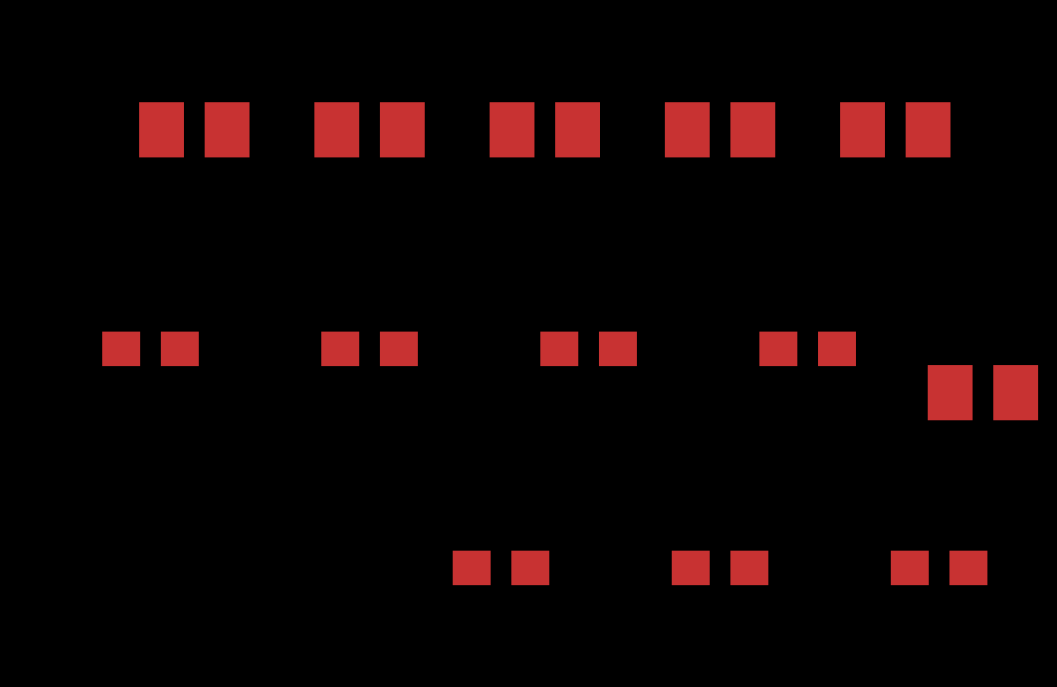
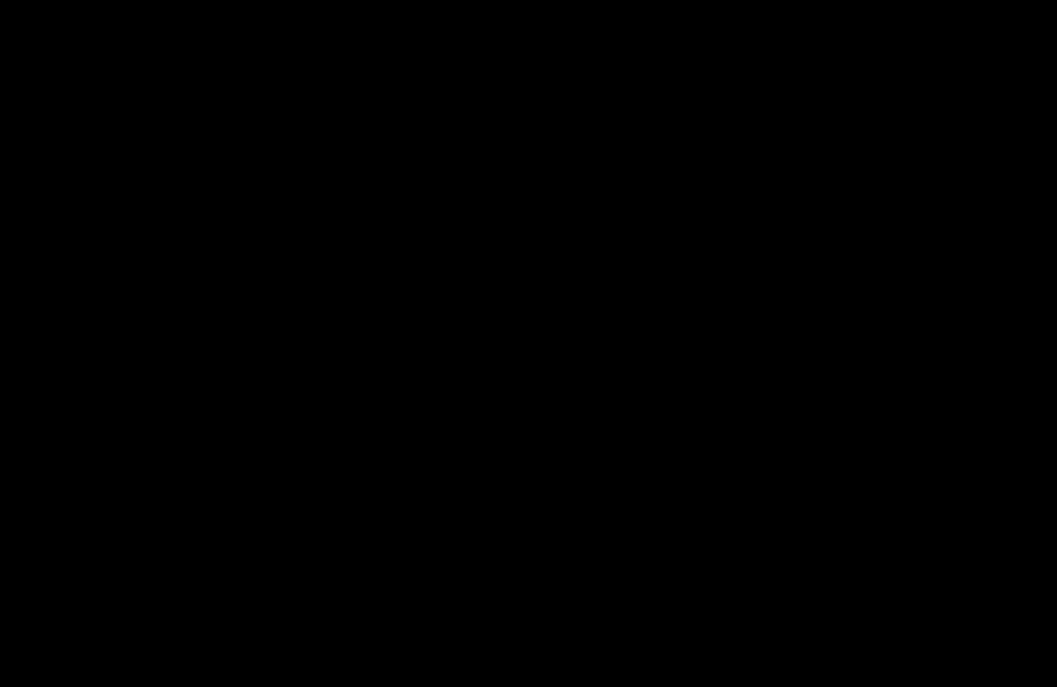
part: (194, 129) -> none
part: (369, 129) -> none
part: (544, 129) -> none
part: (720, 129) -> none
part: (895, 129) -> none
part: (150, 348) -> none
part: (369, 348) -> none
part: (588, 348) -> none
part: (807, 348) -> none
part: (982, 392) -> none
part: (500, 567) -> none
part: (720, 567) -> none
part: (939, 567) -> none

